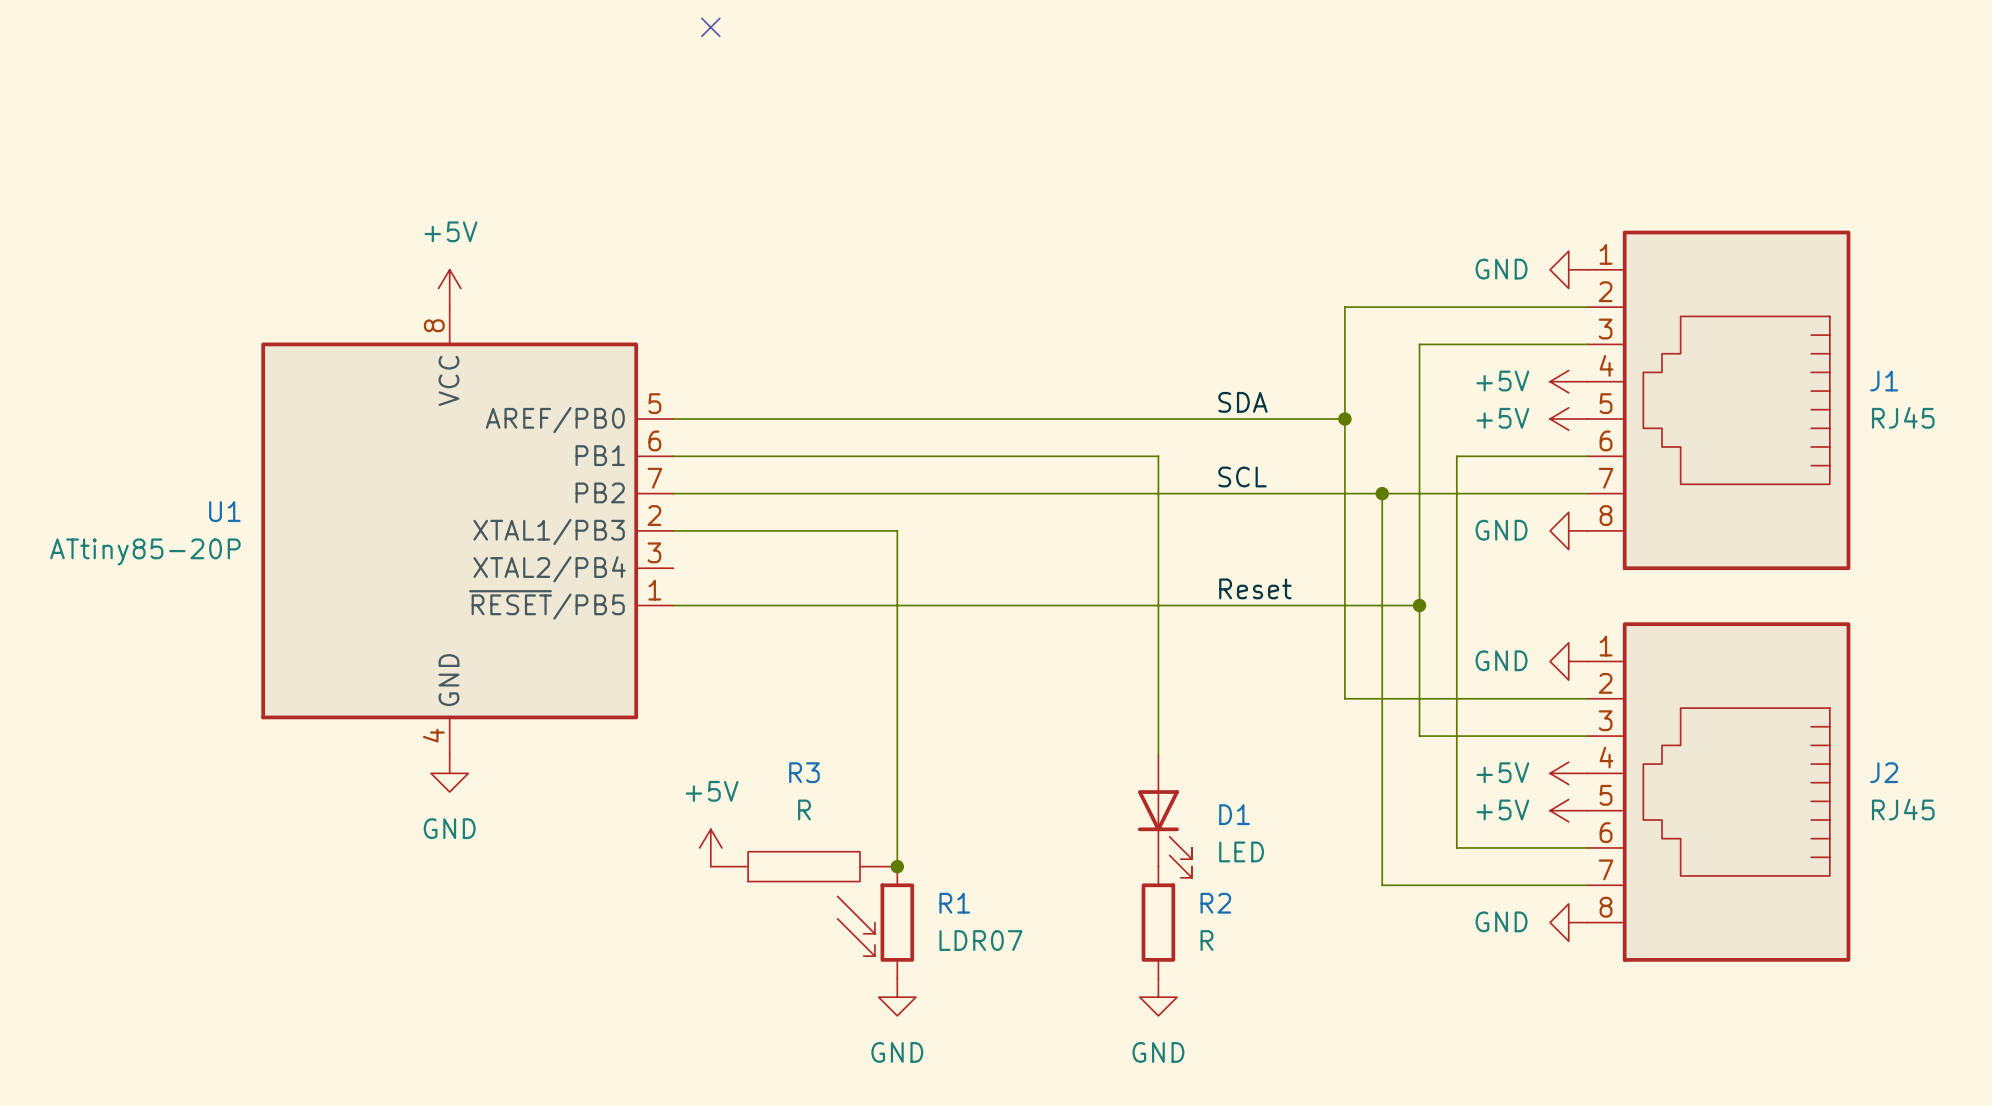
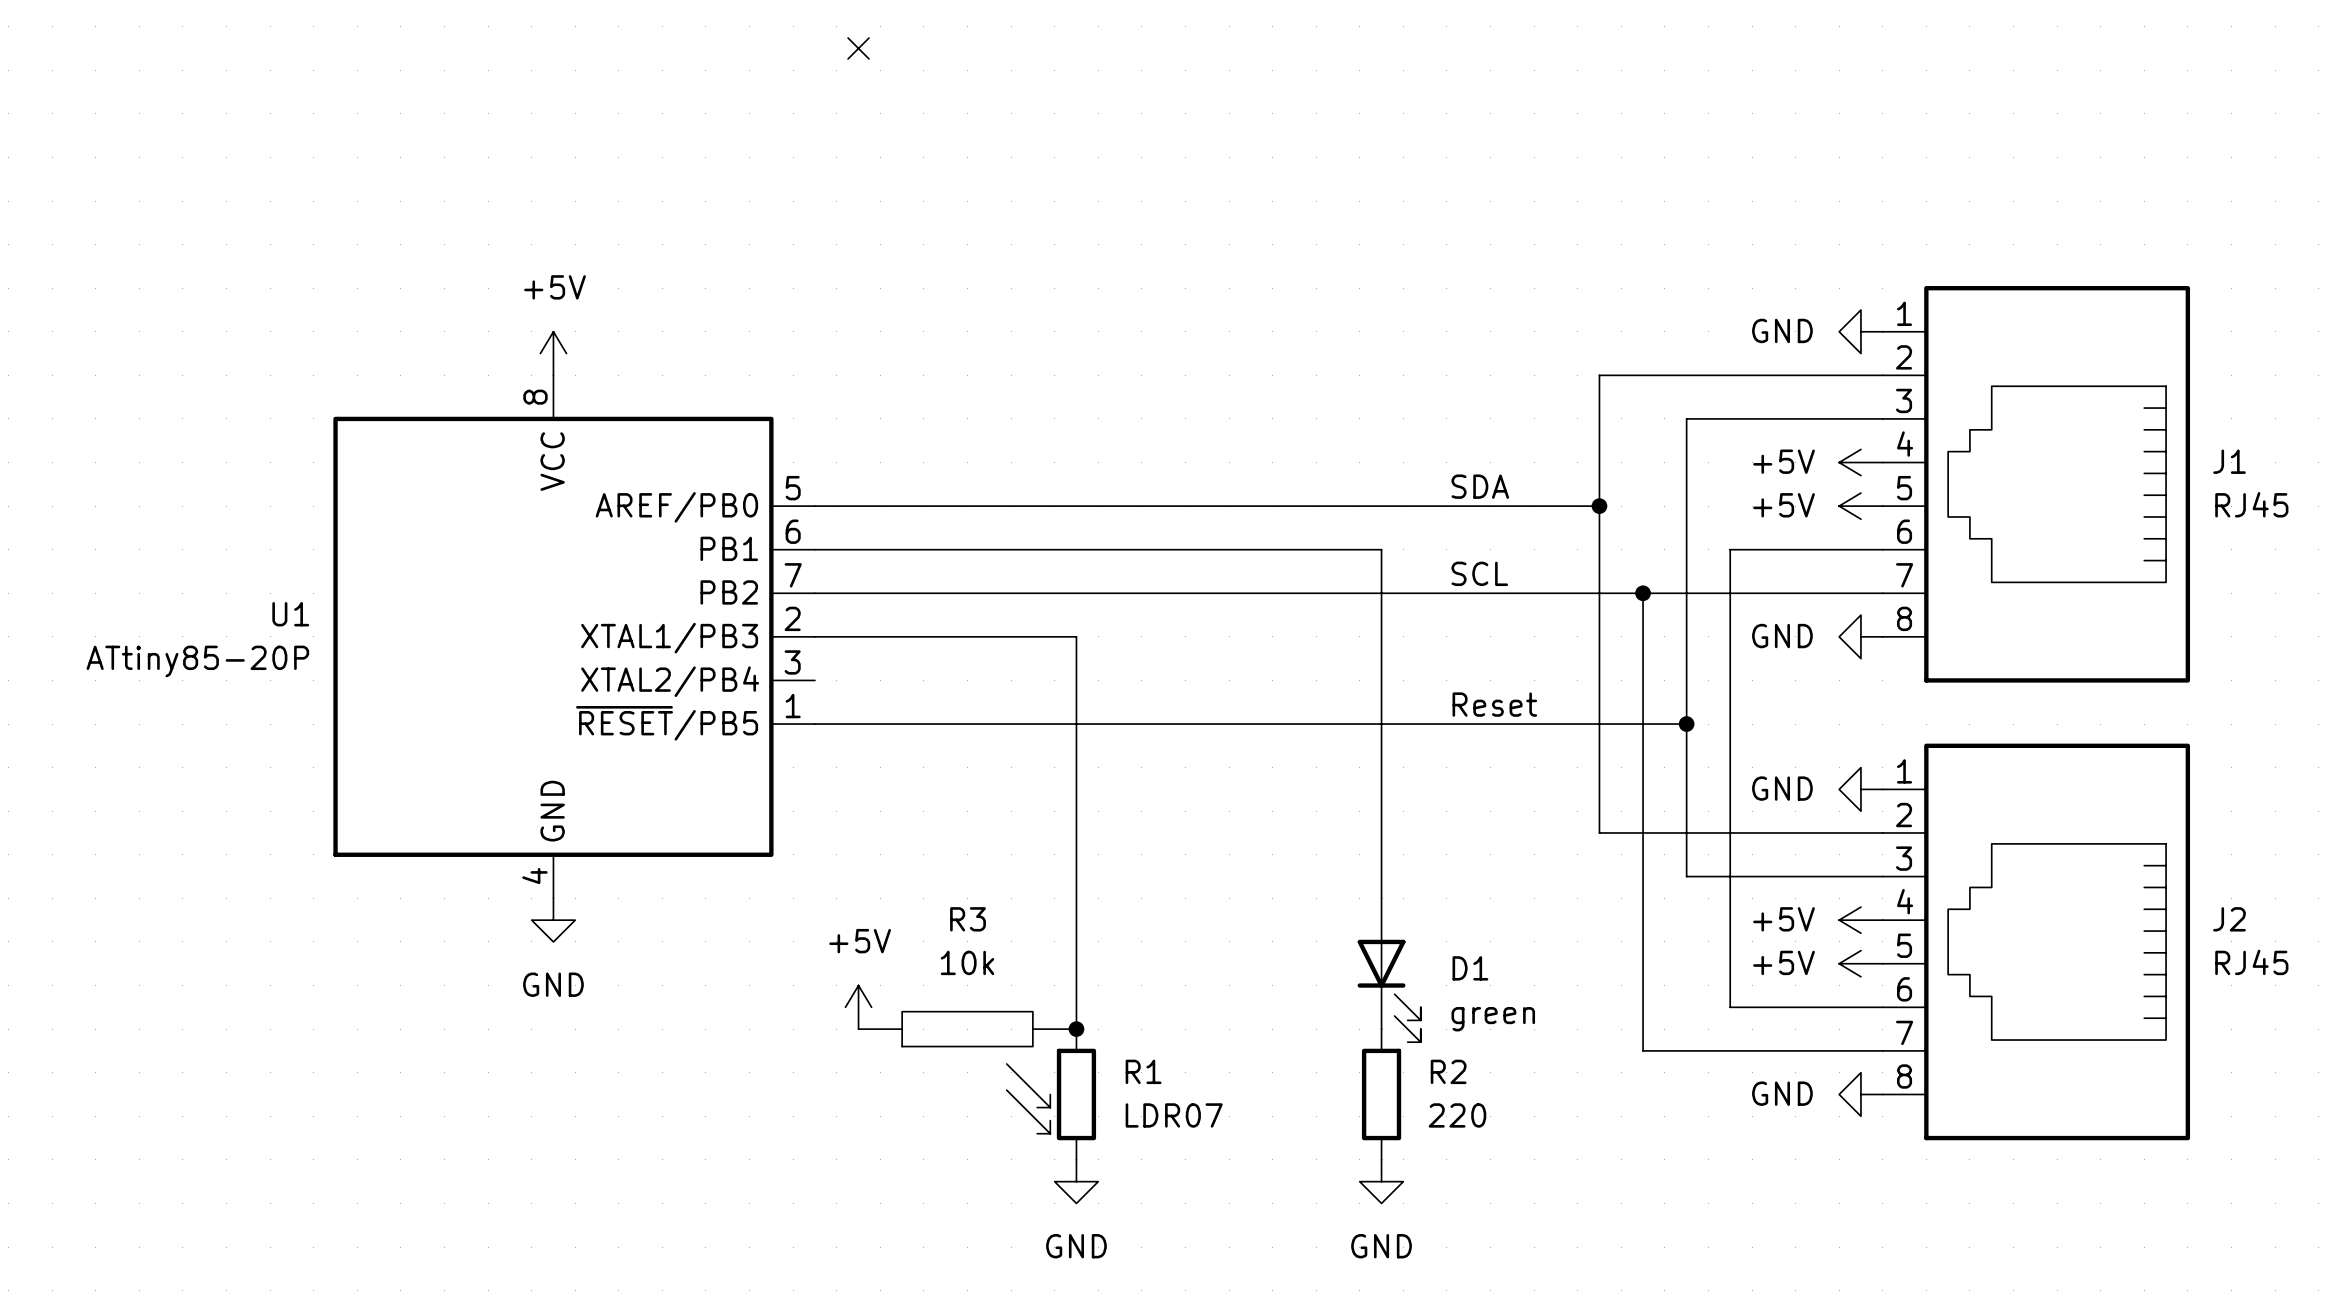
R3 value: R (804, 809) -> 10k (967, 962)
D1 value: LED (1241, 851) -> green (1493, 1019)
R2 value: R (1206, 940) -> 220 (1457, 1115)

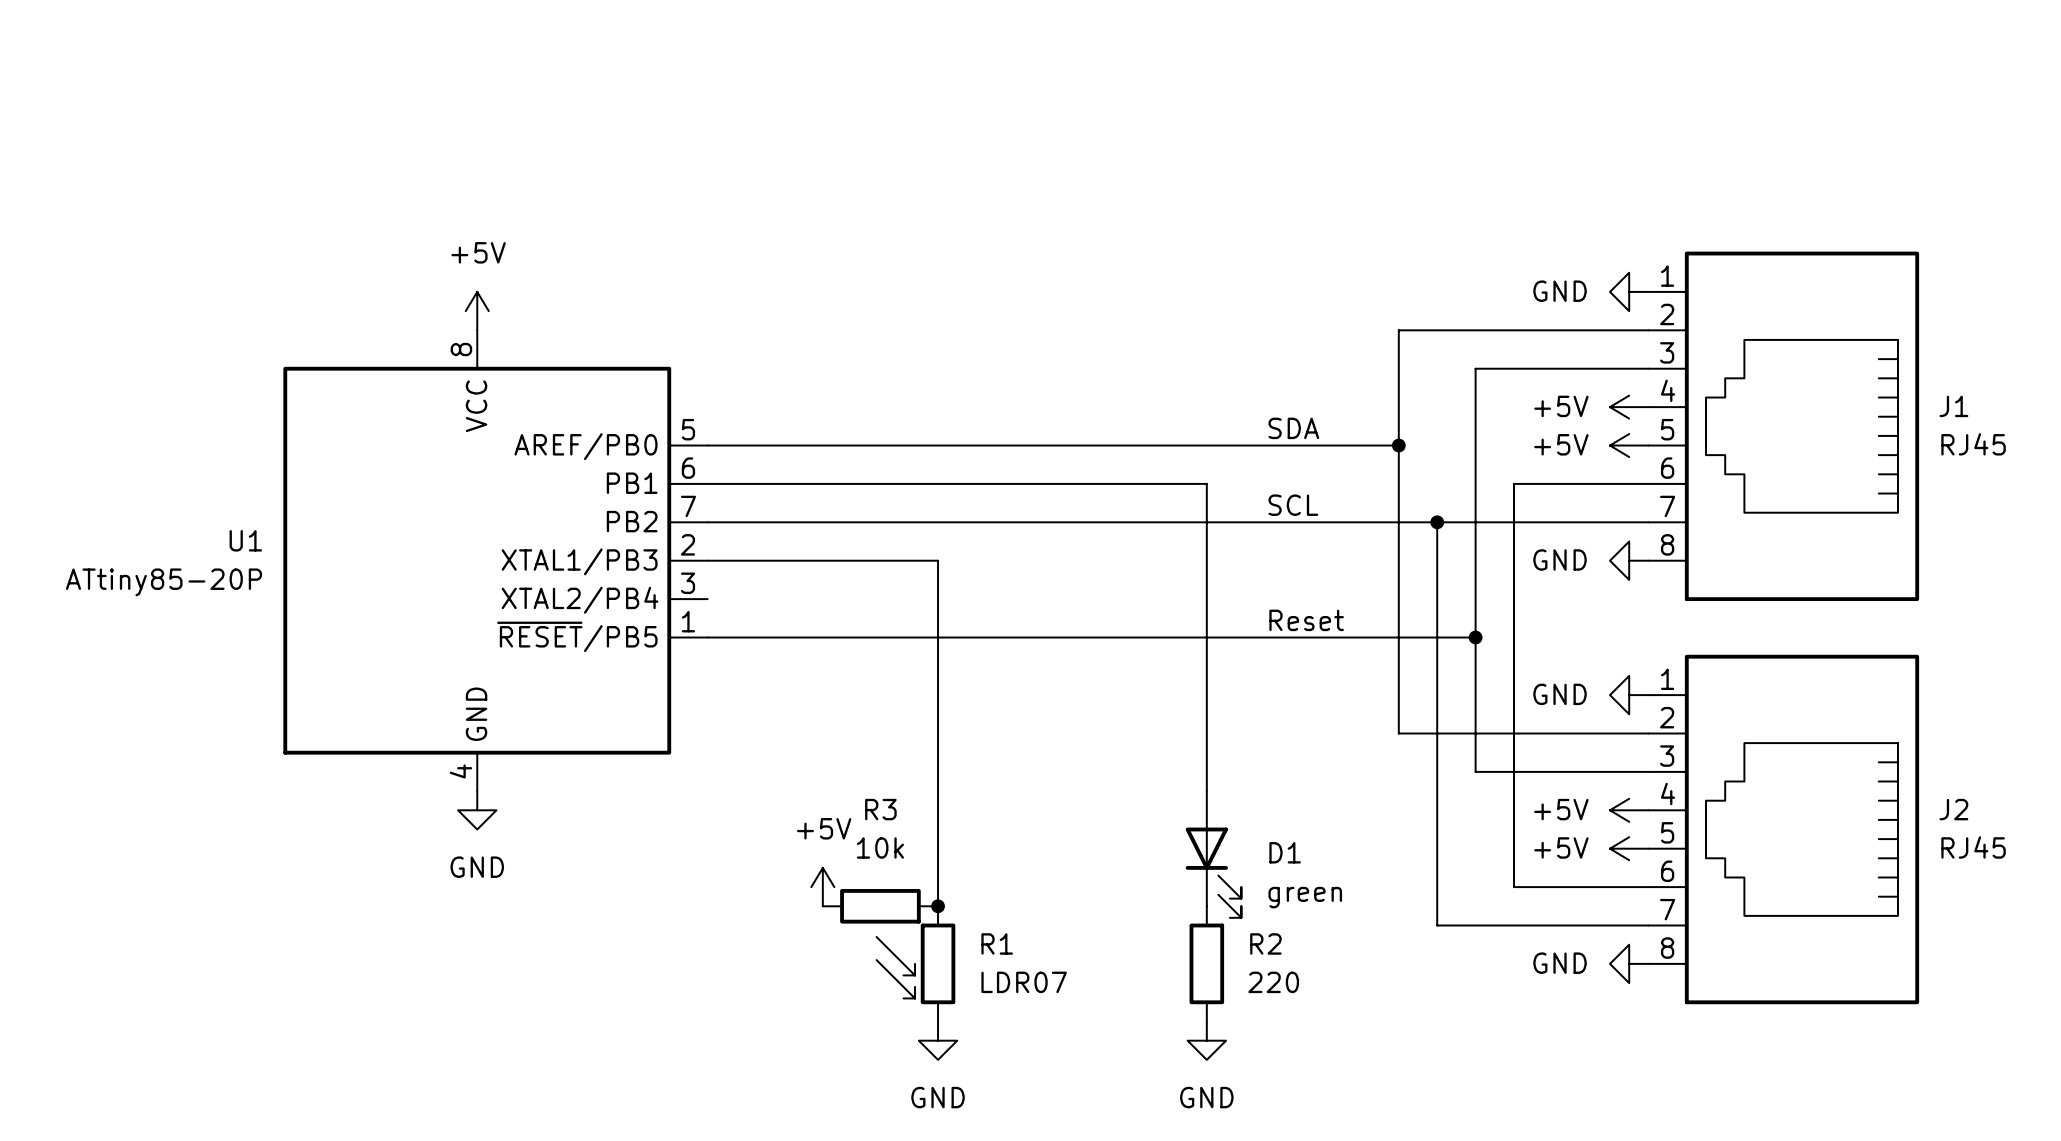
no-connect mark: (858, 48) -> none
power symbol position: +5V (858, 1007) -> +5V (822, 887)
R3 symbol: [858, 1011, 1077, 1047] -> [822, 889, 939, 924]

